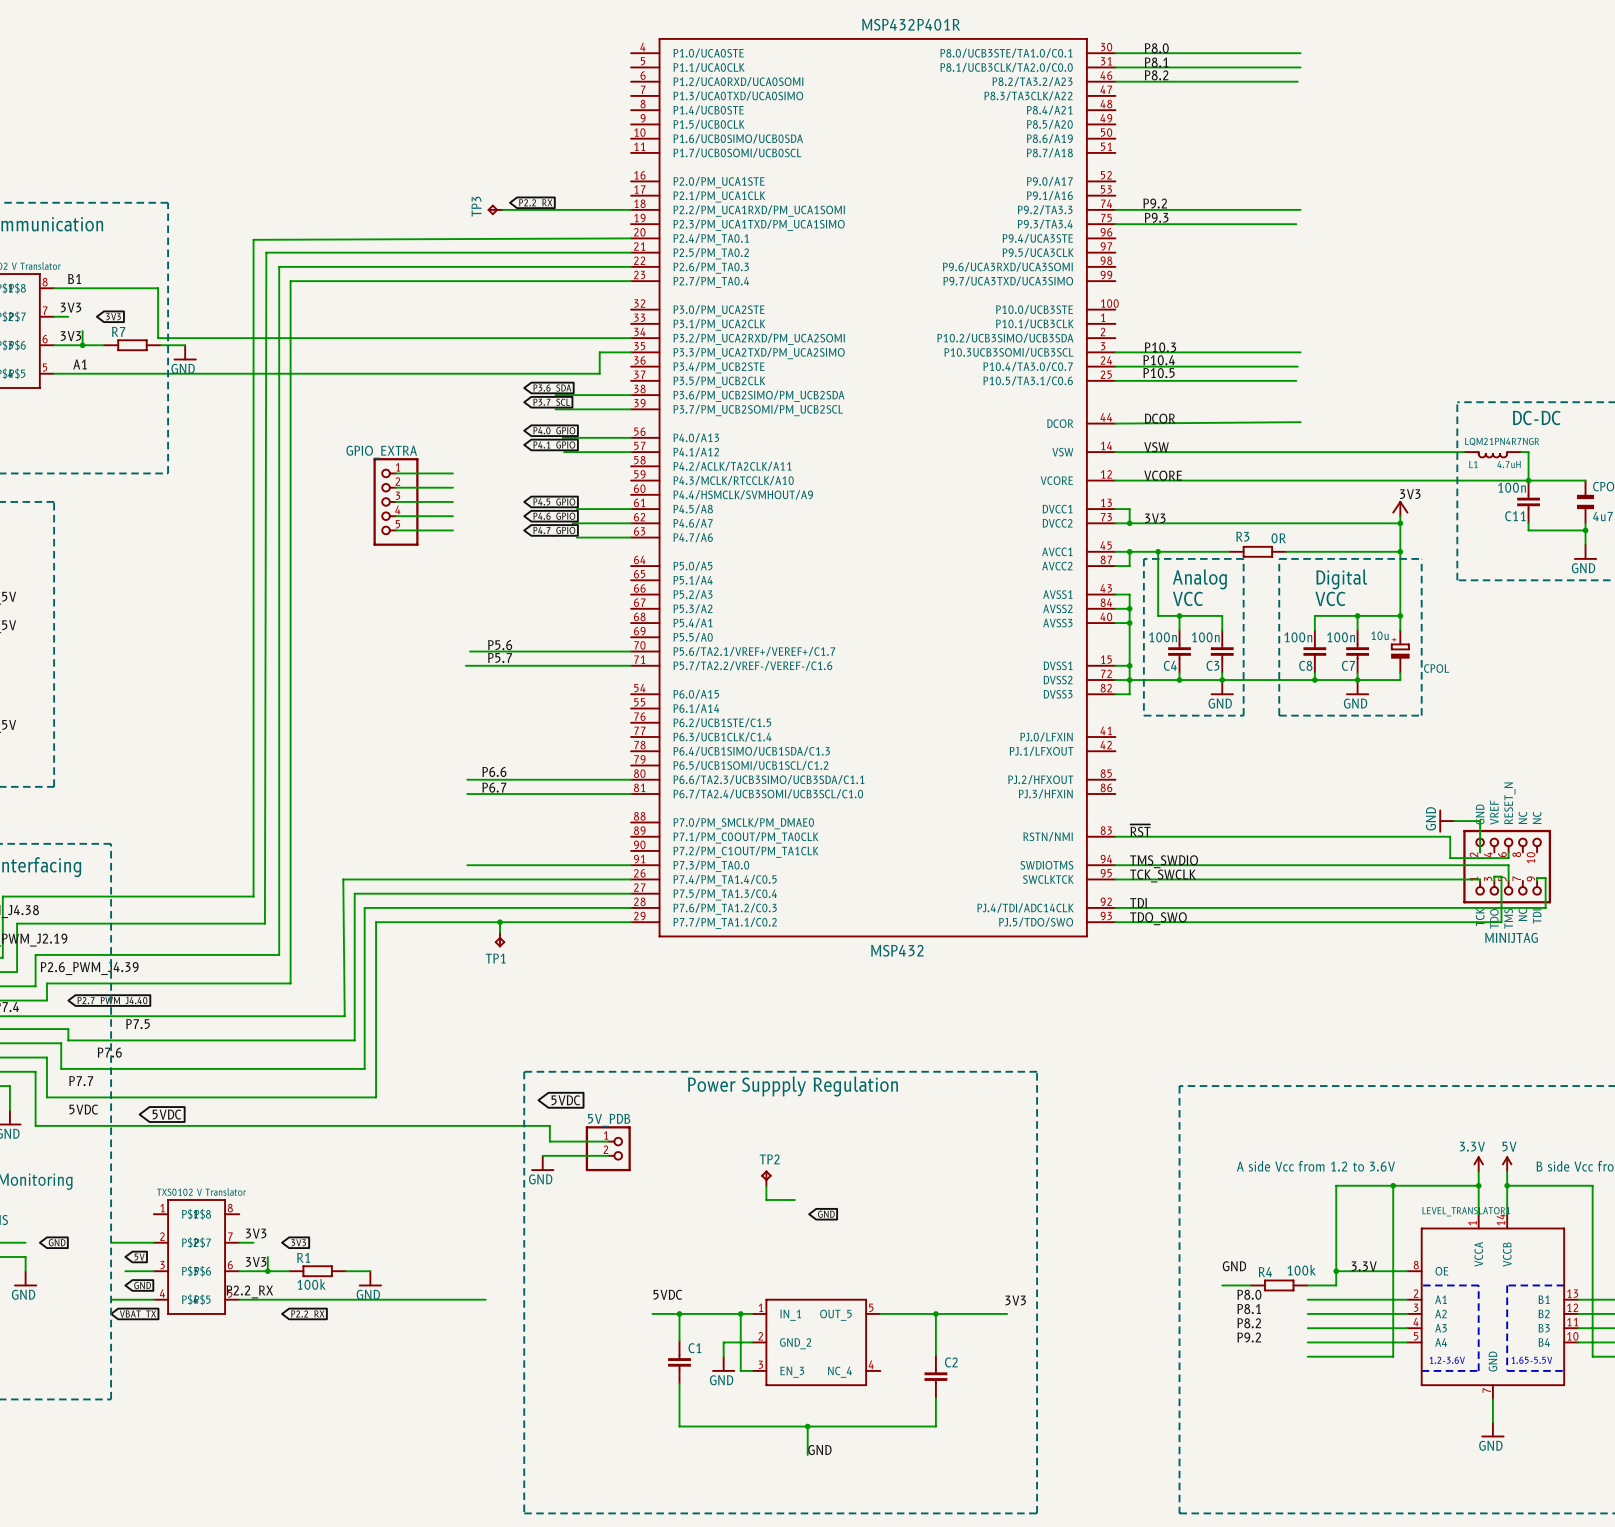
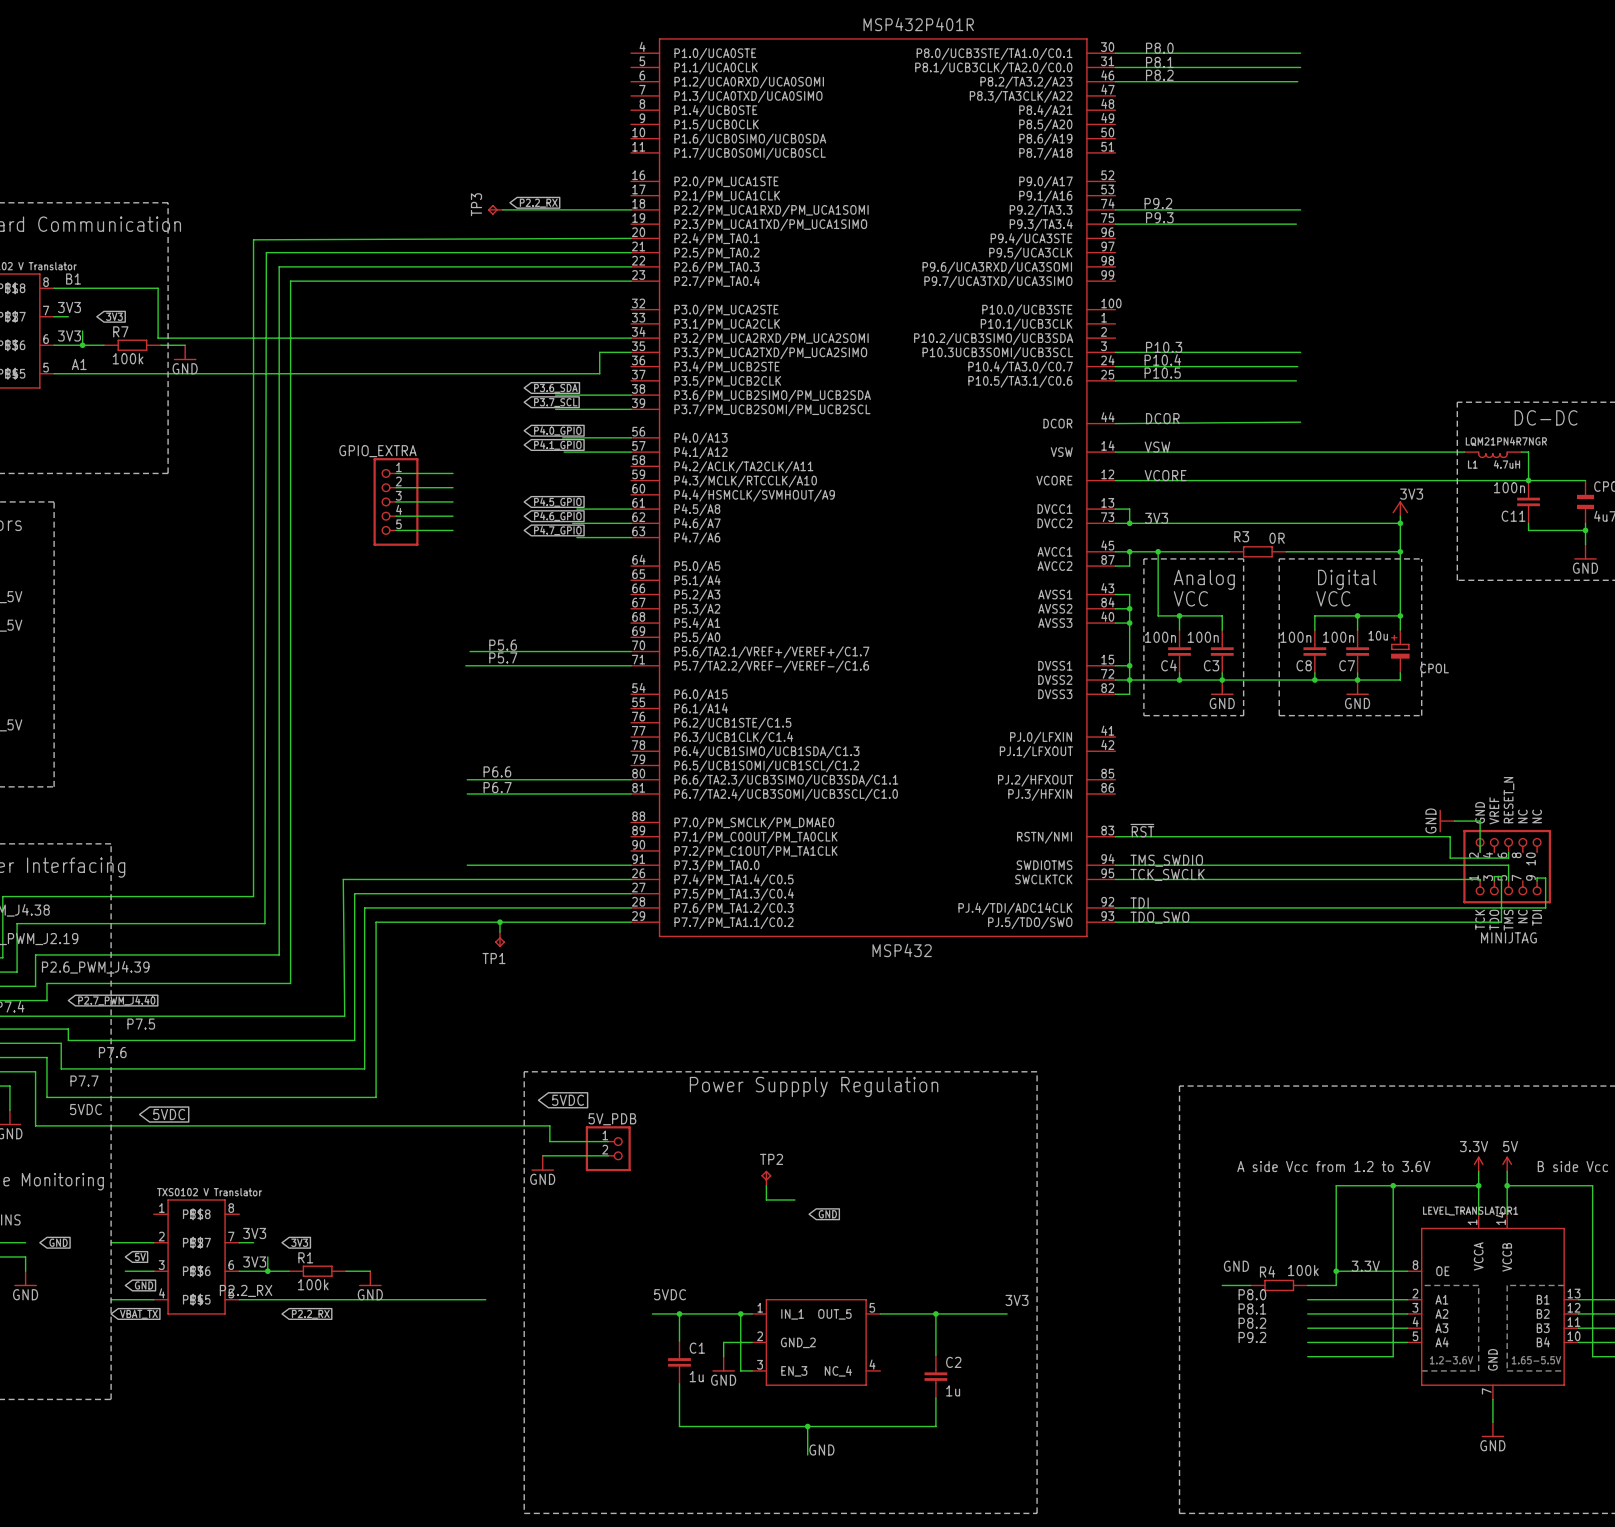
R7 value: none -> 100k (128, 358)
C1 value: none -> 1u (696, 1376)
C2 value: none -> 1u (953, 1390)

